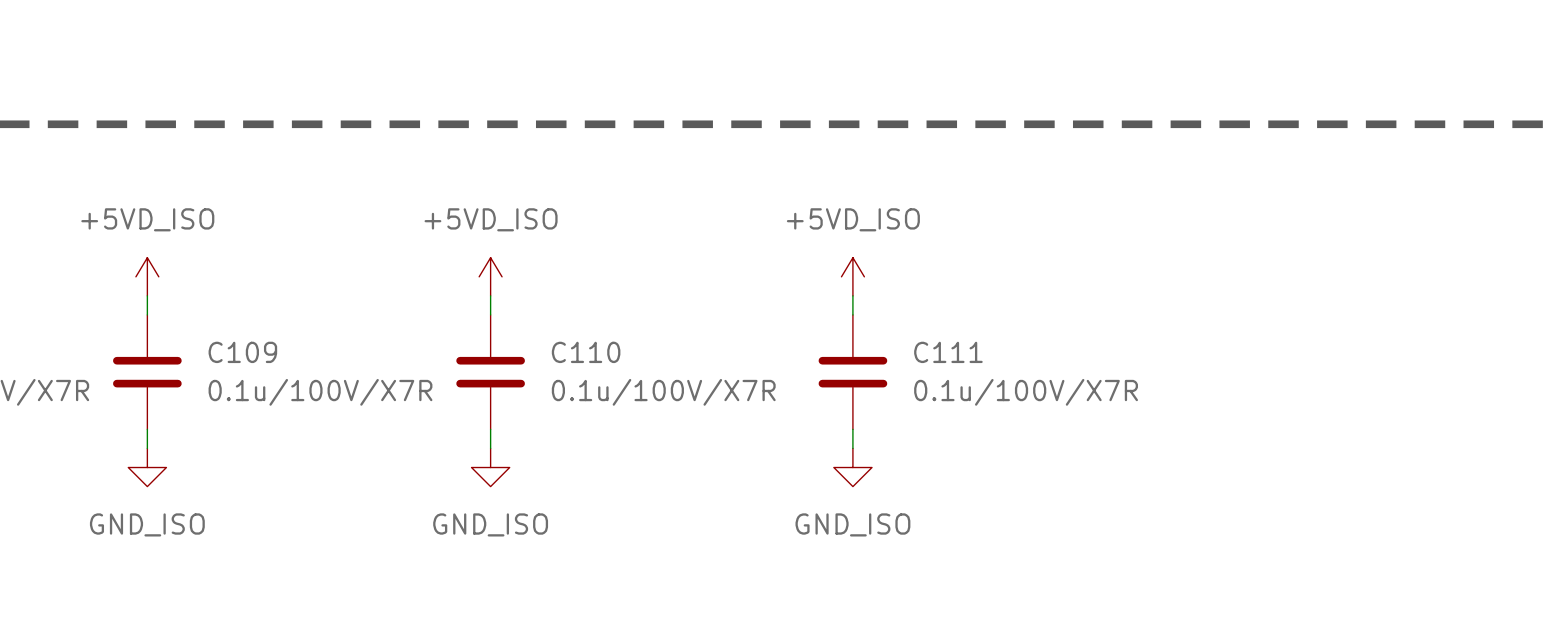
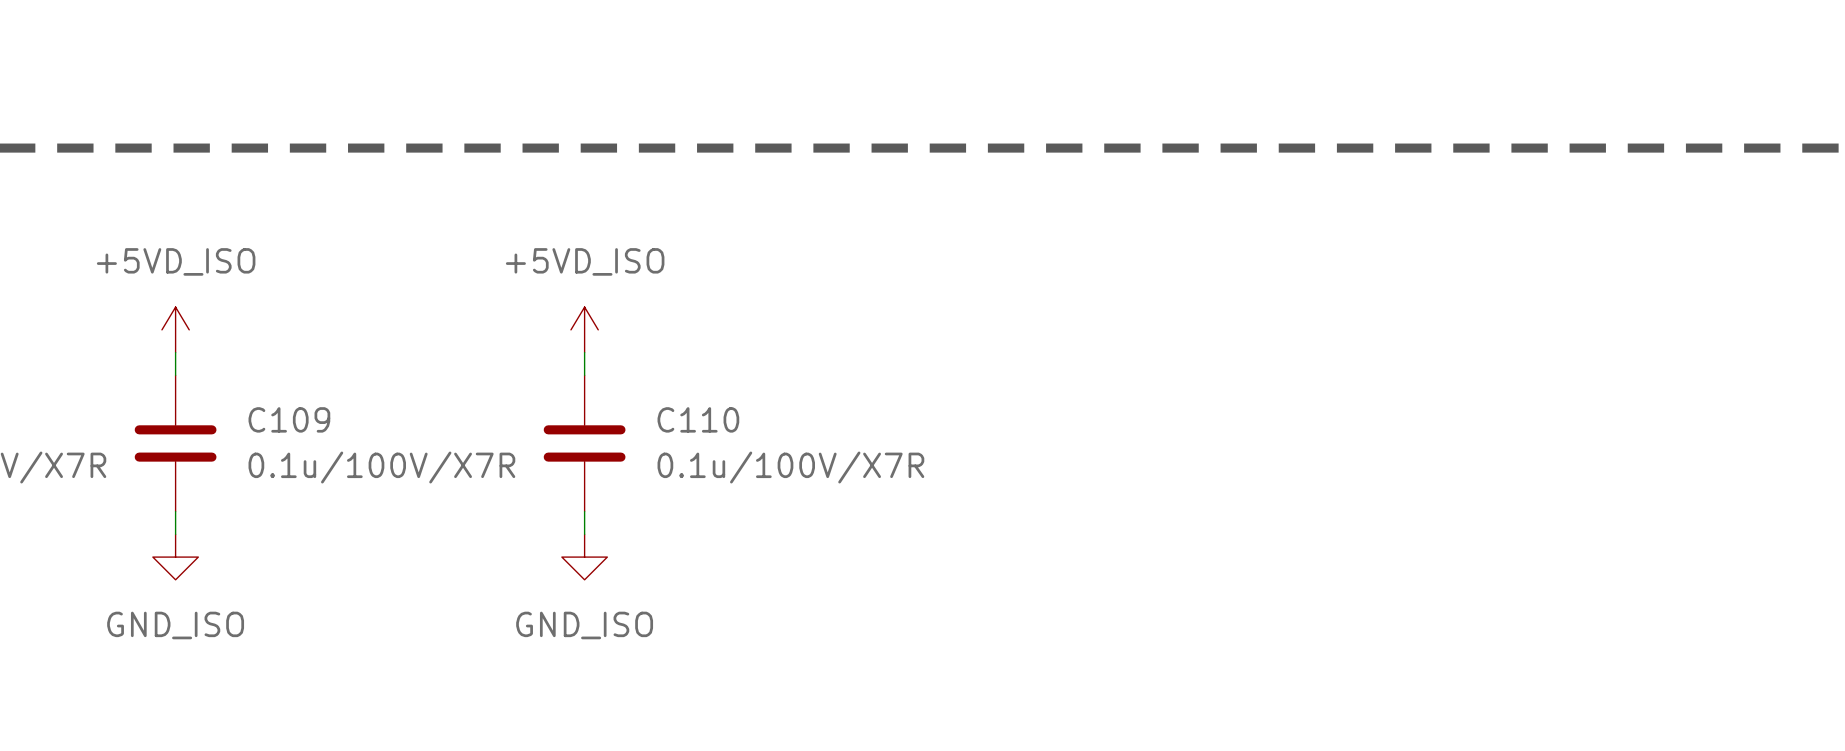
power symbol: +5VD_ISO (852, 276) -> none
wire: (852, 295) (852, 314) -> none
C111: 0.1u/100V/X7R (852, 372) -> none
wire: (852, 429) (852, 448) -> none
power symbol: GND_ISO (852, 467) -> none

